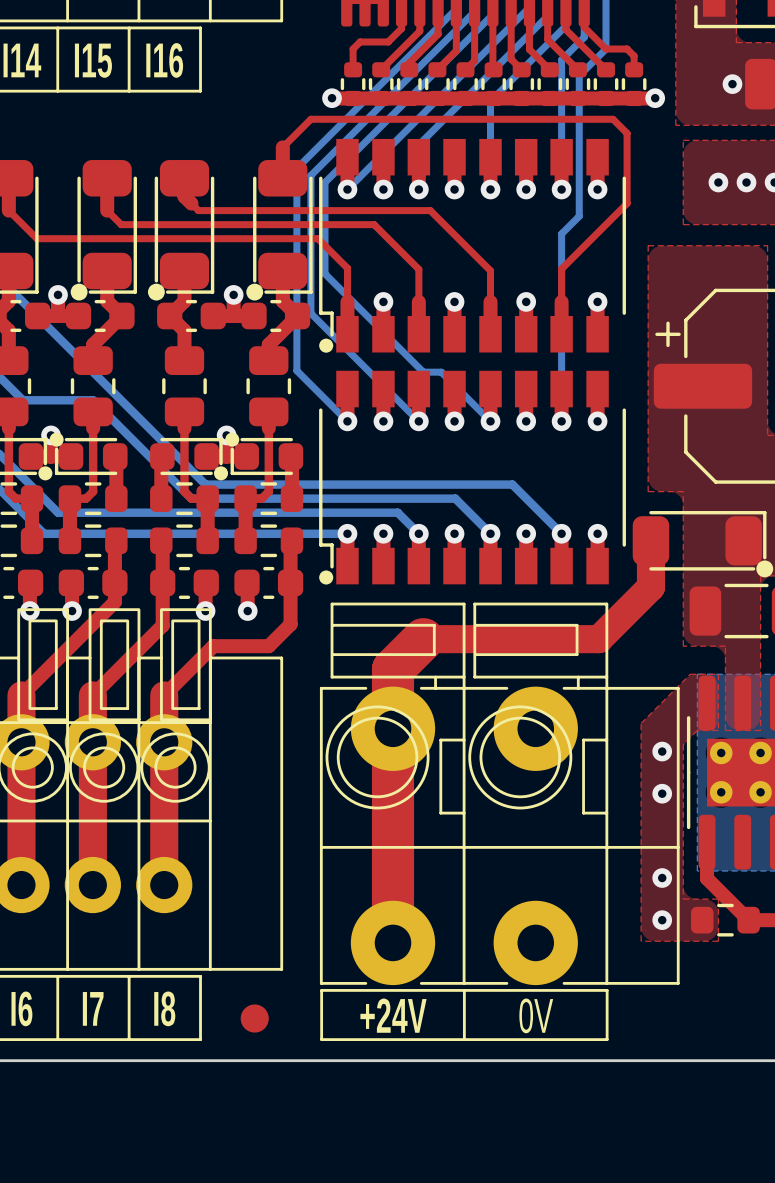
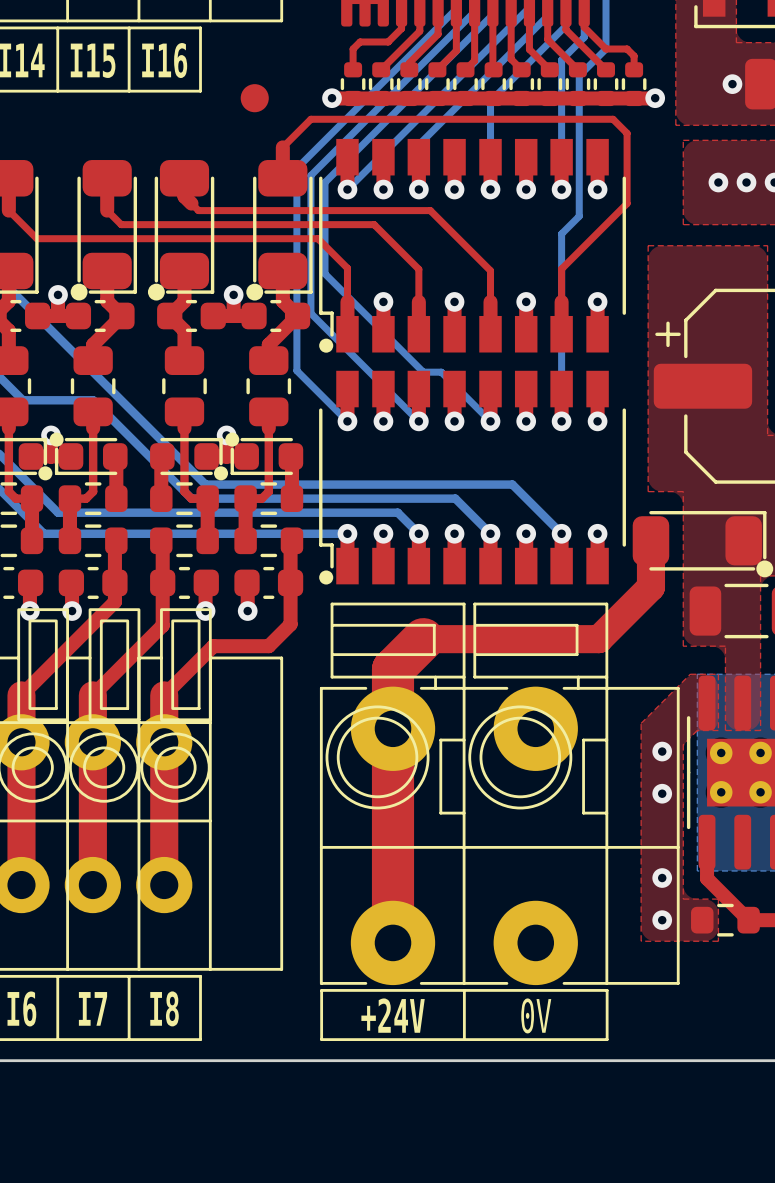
part: none -> (254, 98)
part: (254, 1018) -> none

